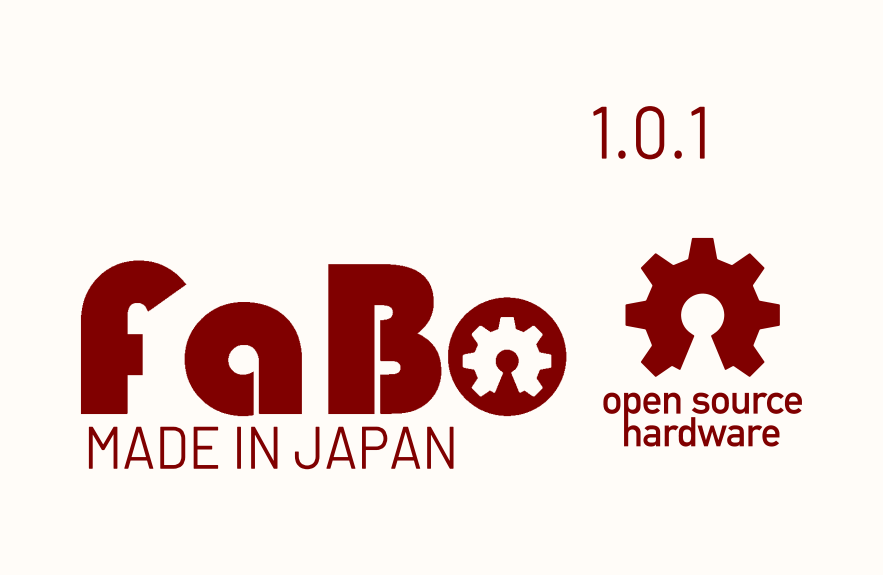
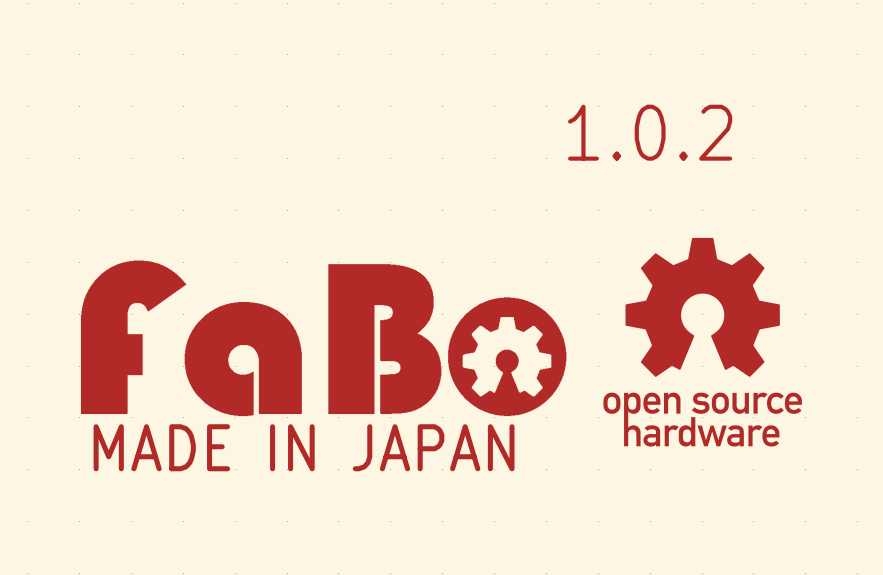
text: 1.0.1 (648, 132) -> 1.0.2 (650, 132)

